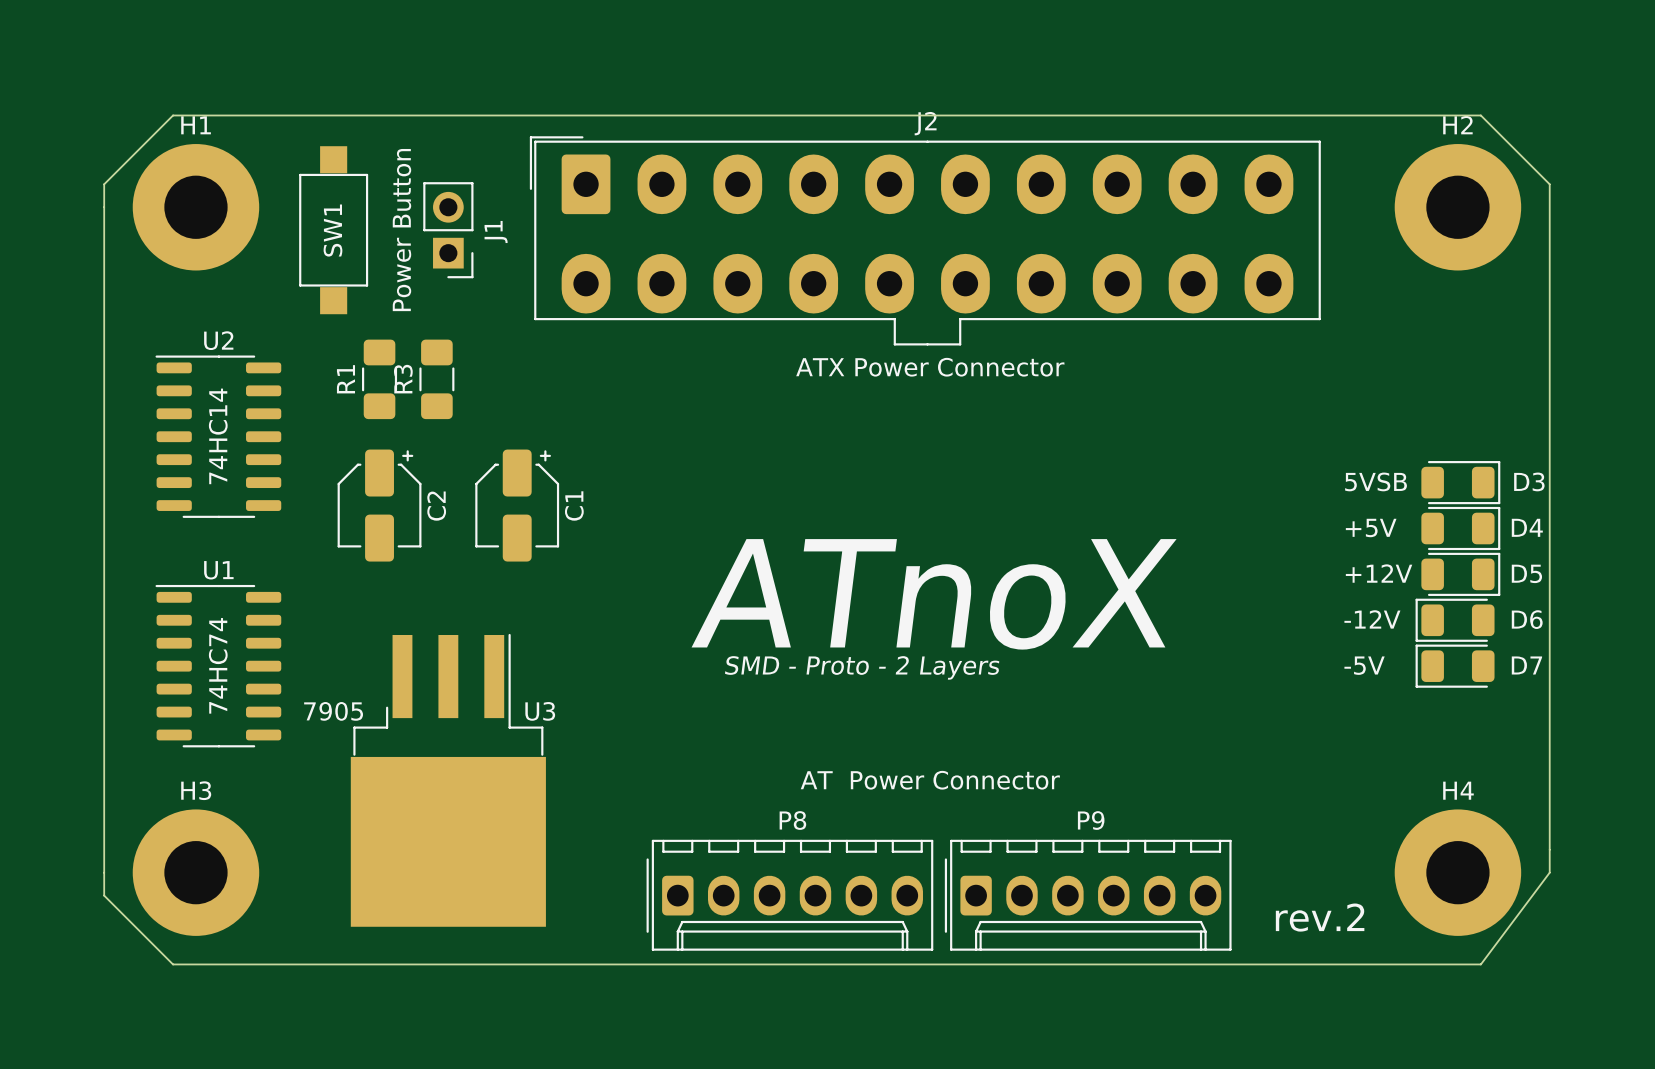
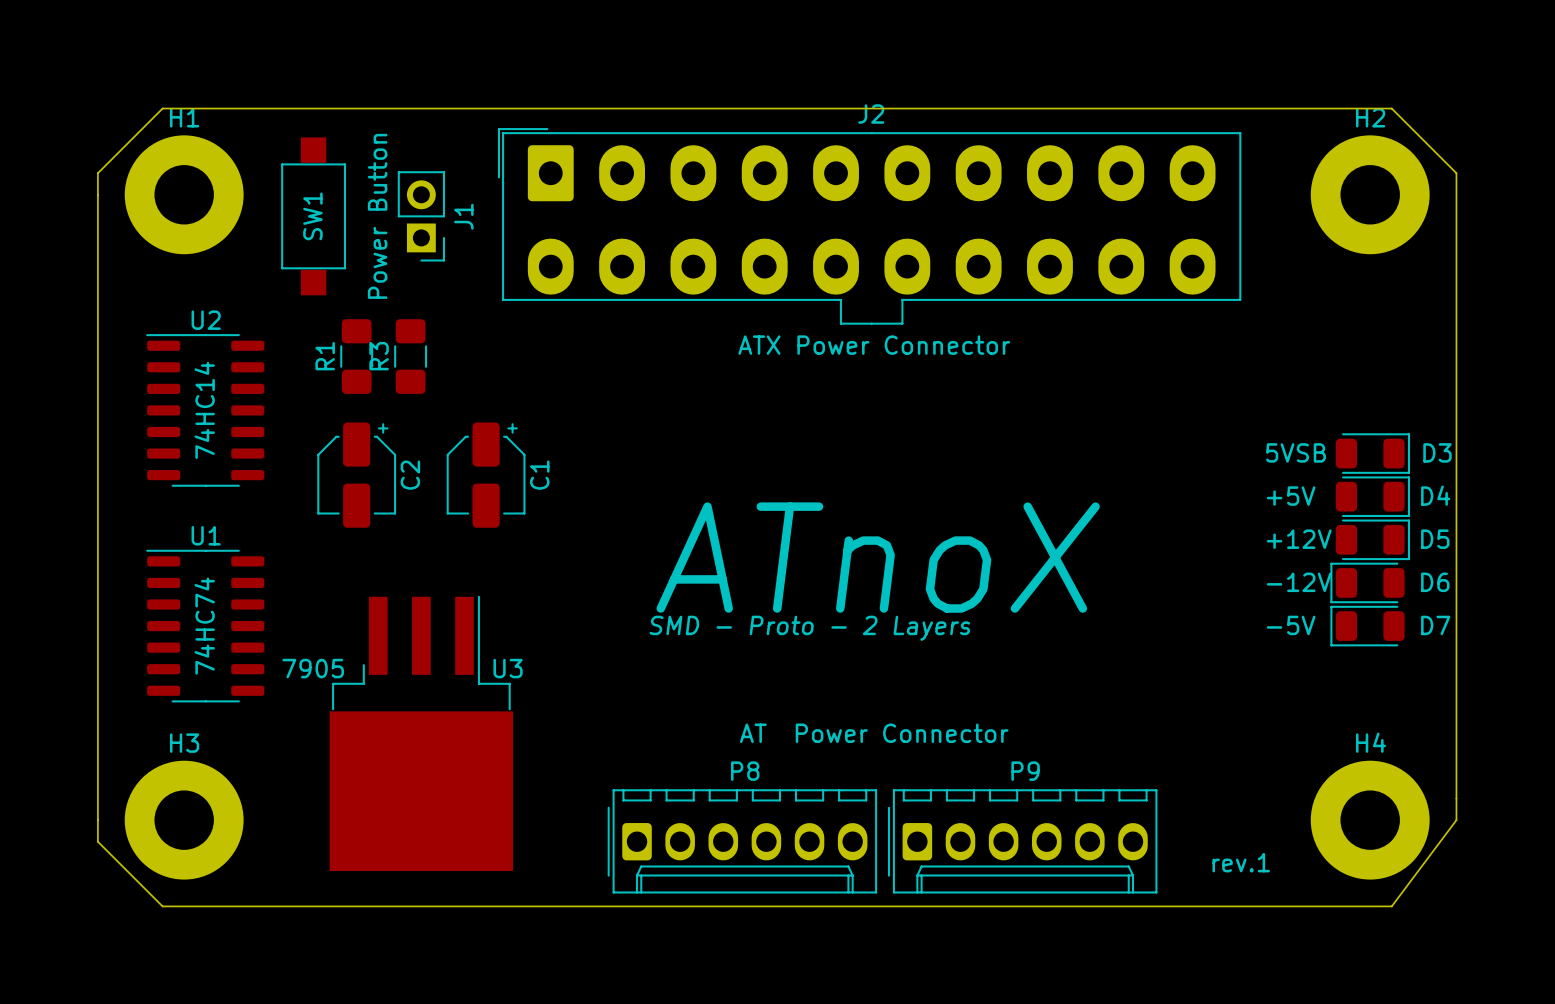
text: rev.2 (1320, 917) -> rev.1 (1241, 862)

